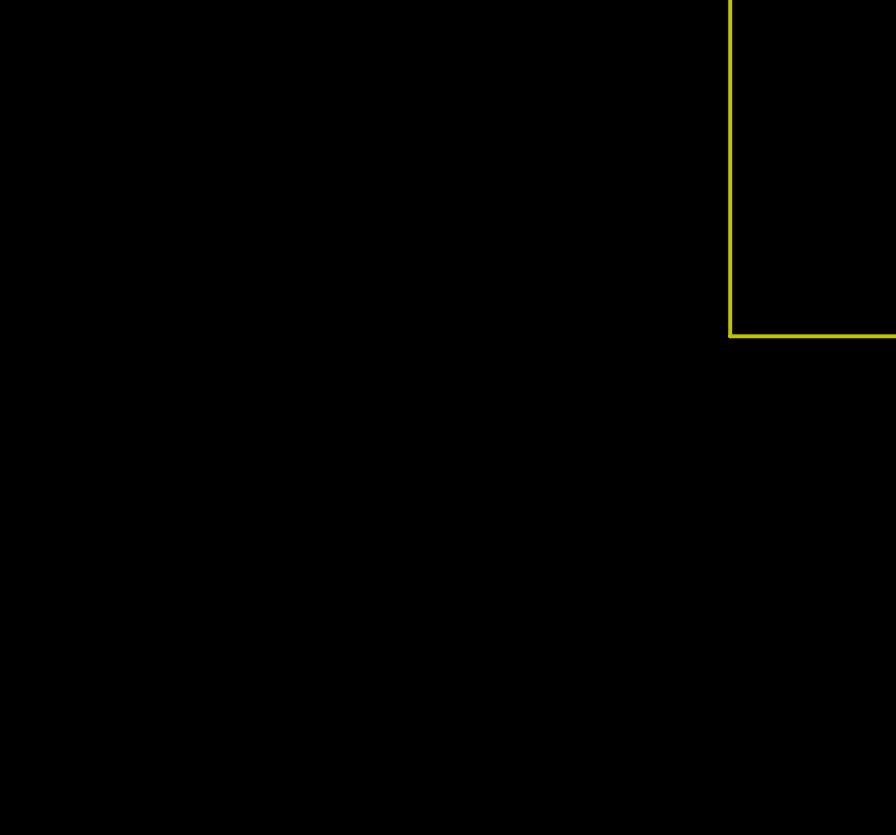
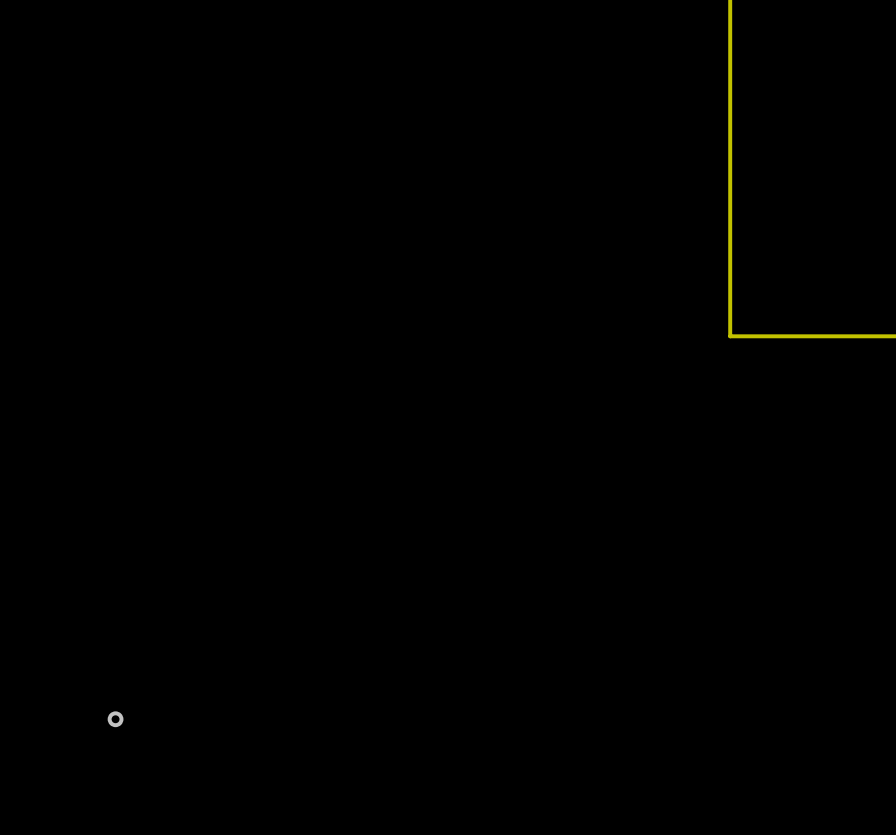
via: none -> (115, 719)

